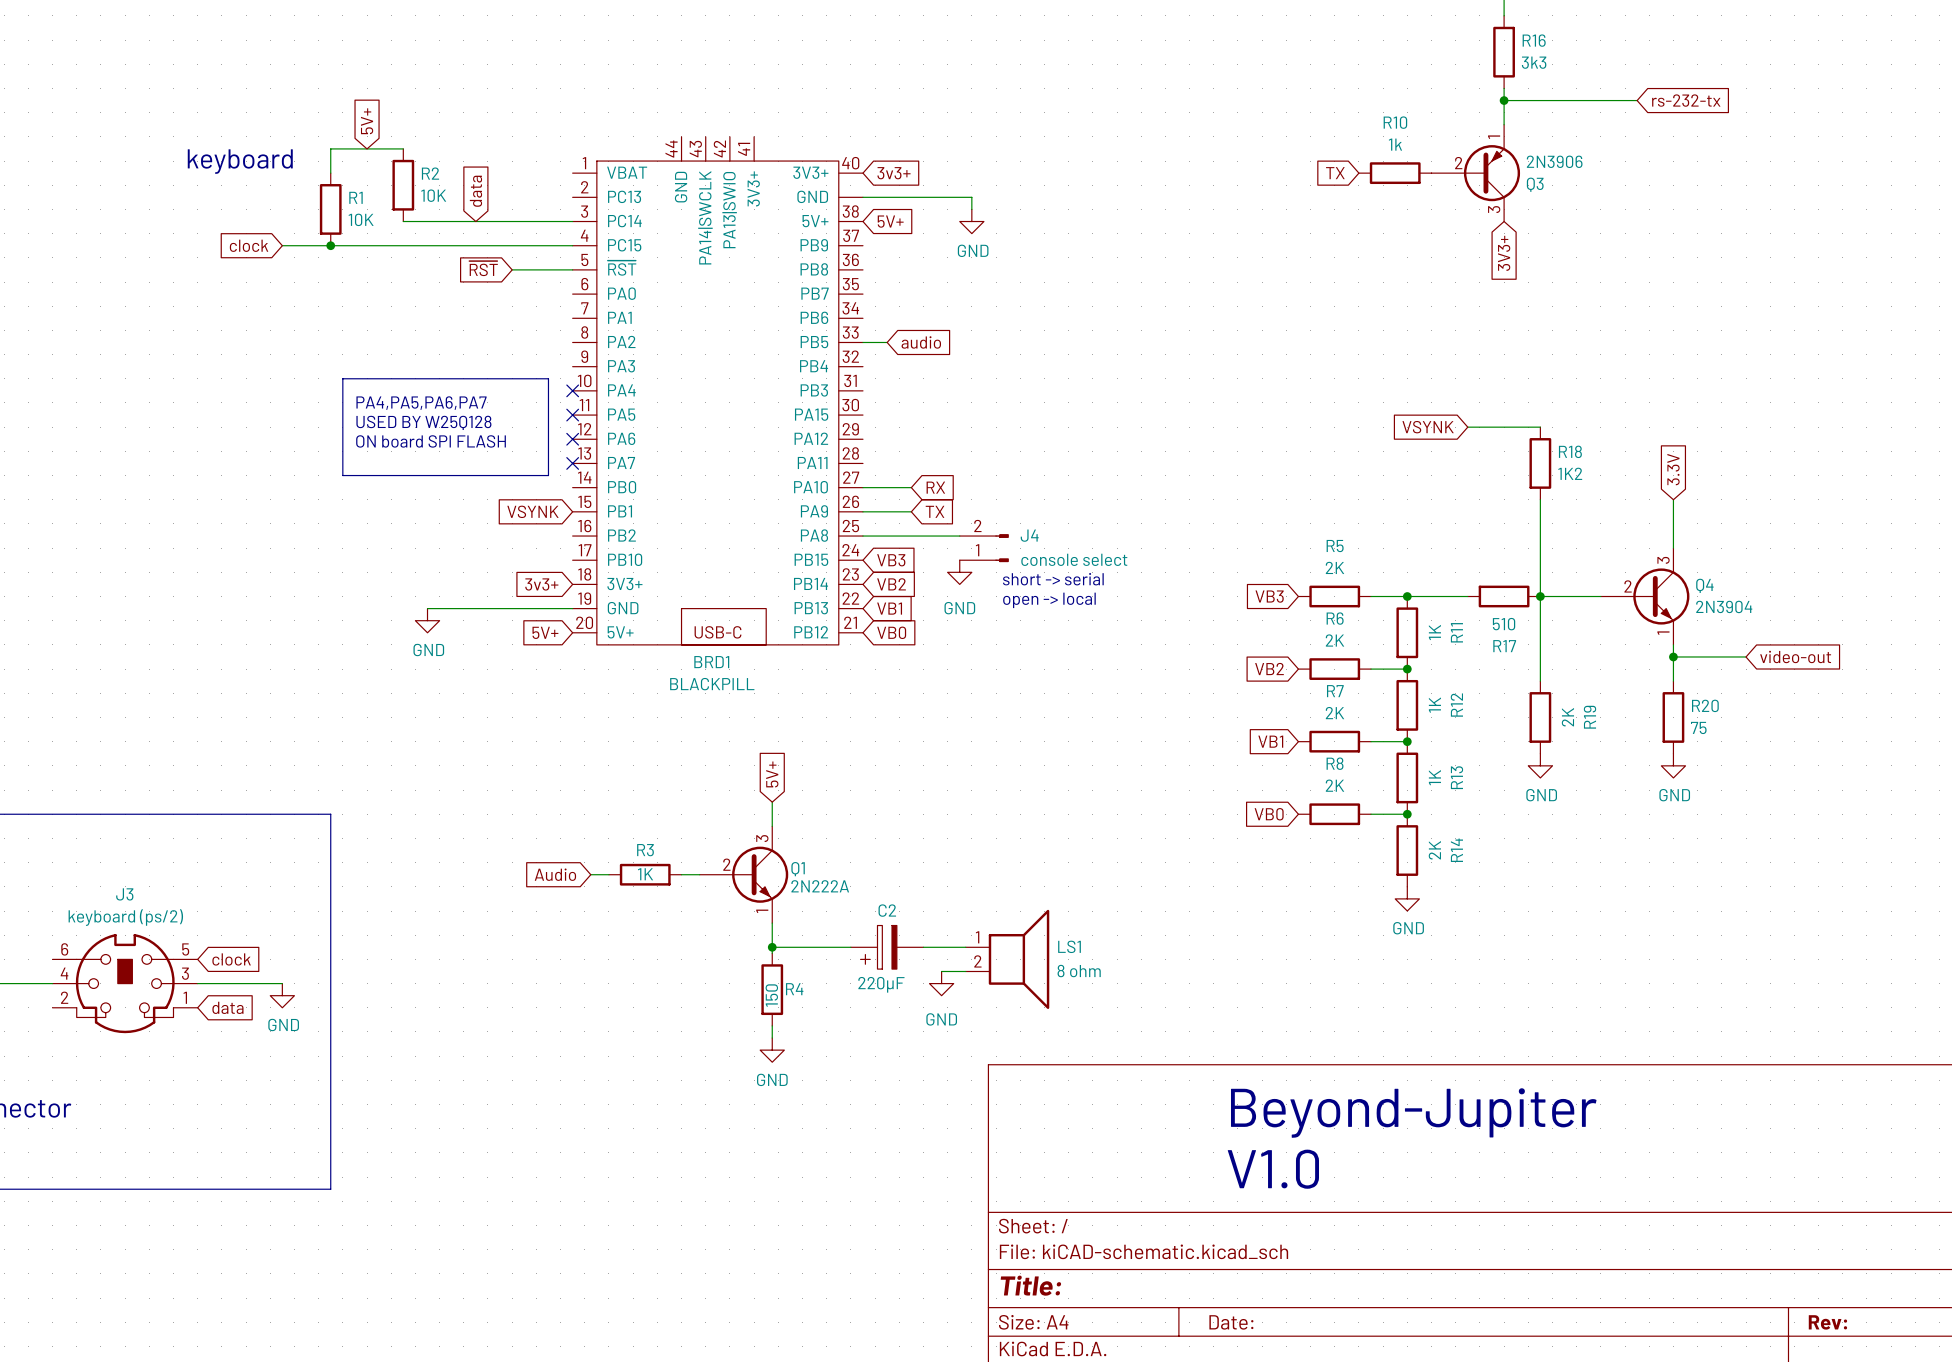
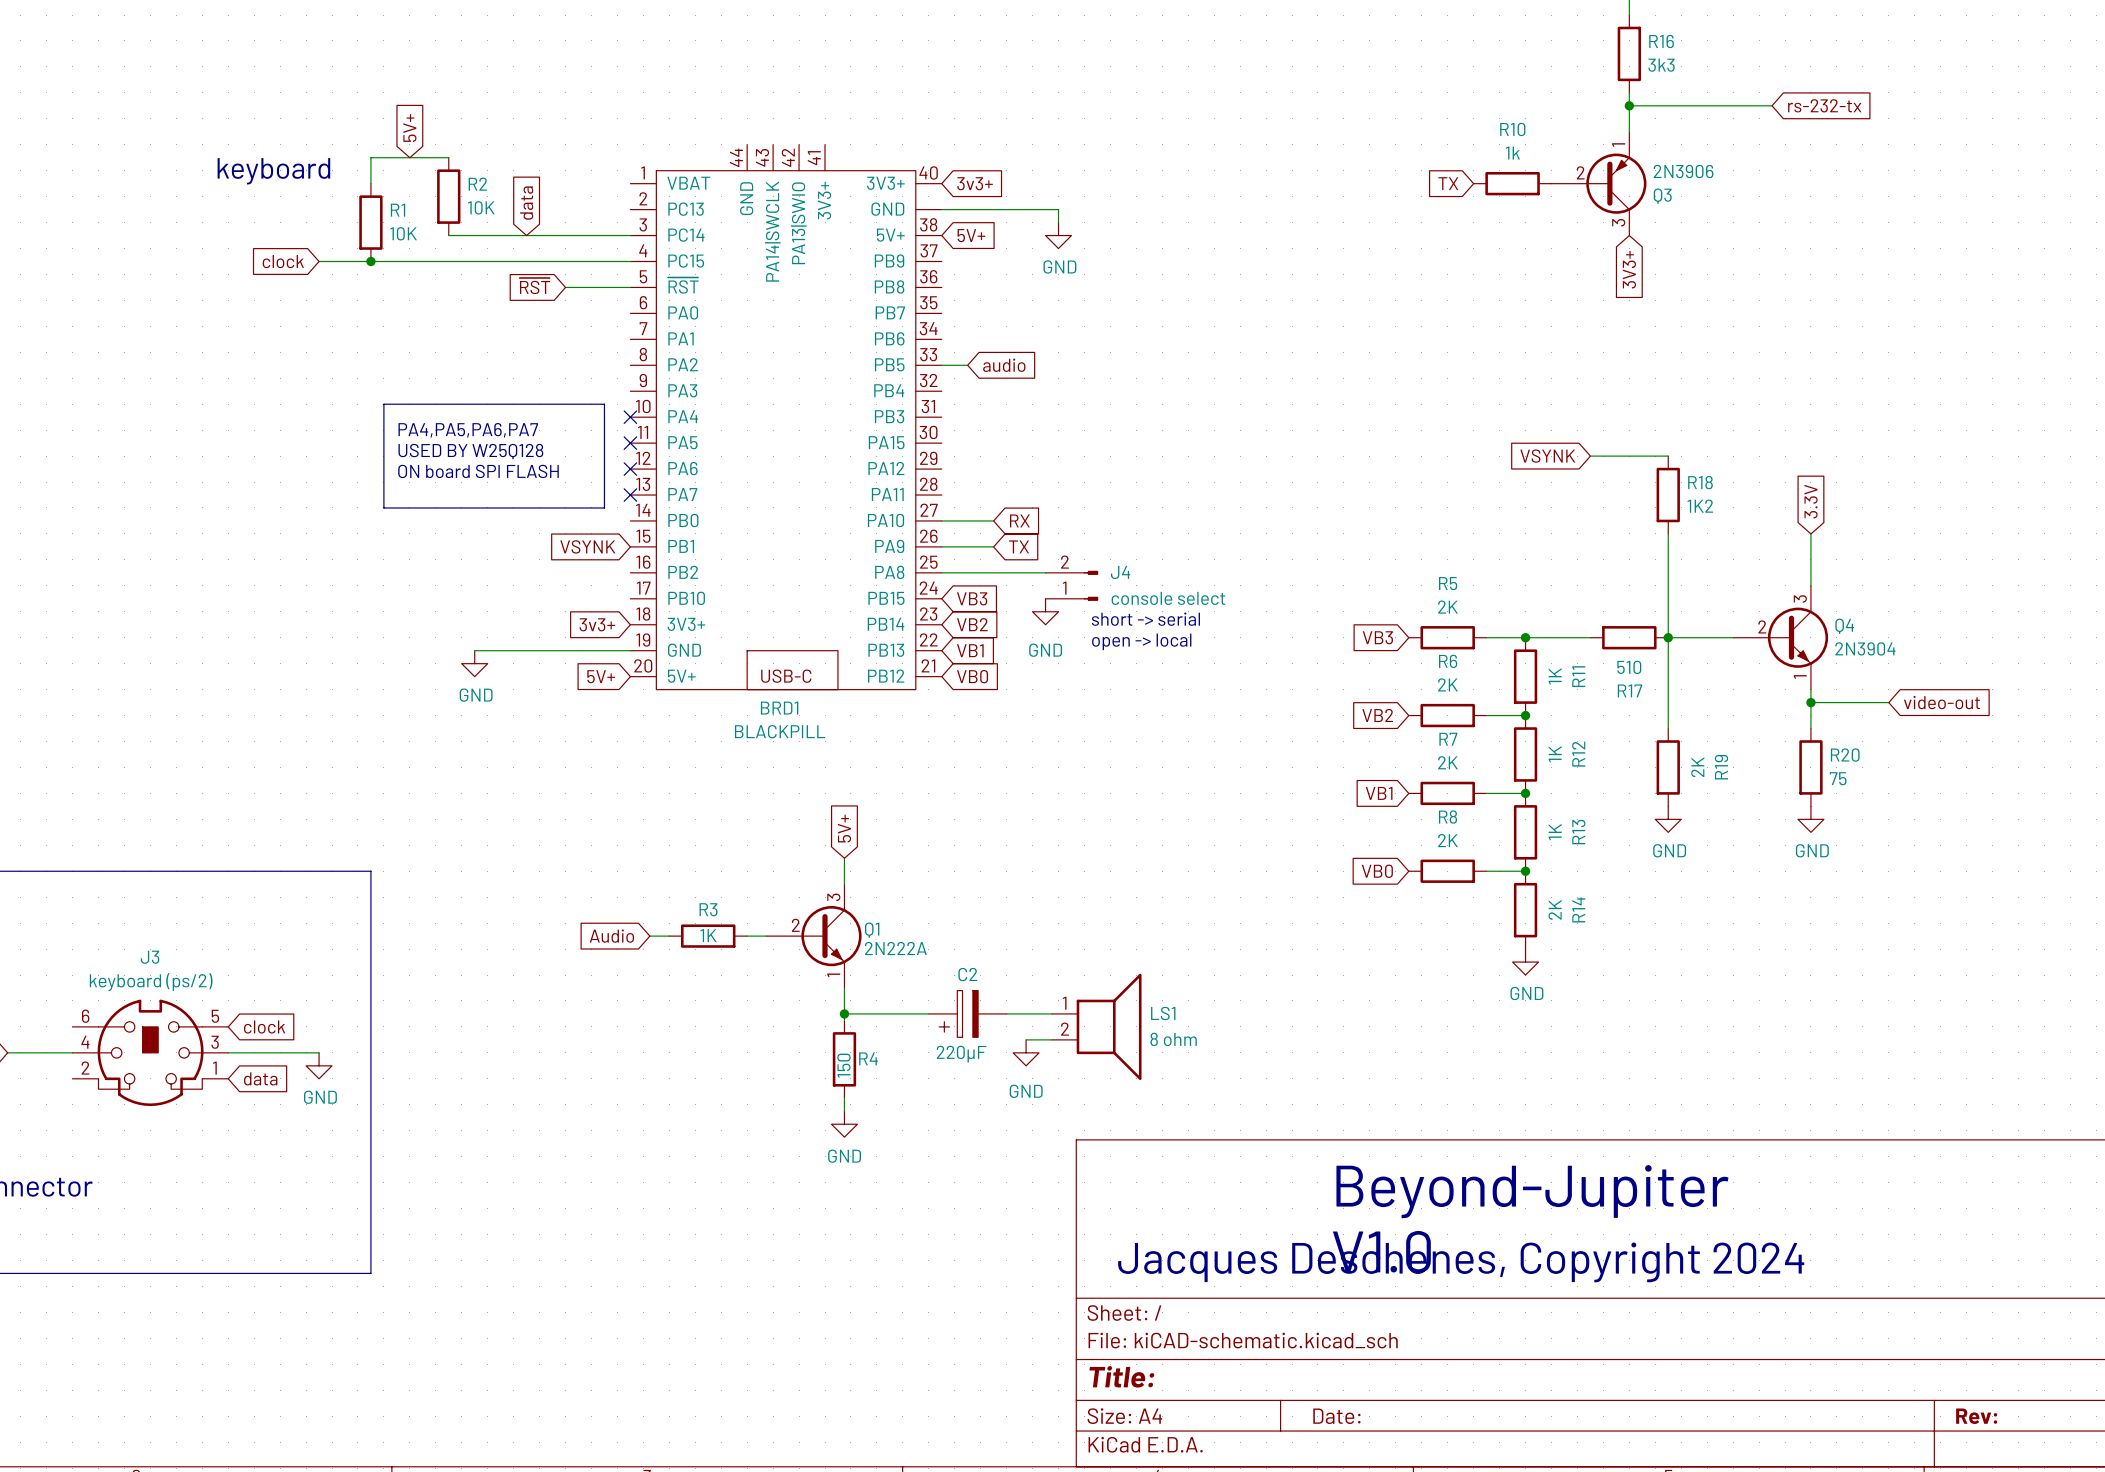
text: none -> Jacques Deschenes, Copyright 2024 (1461, 1262)

